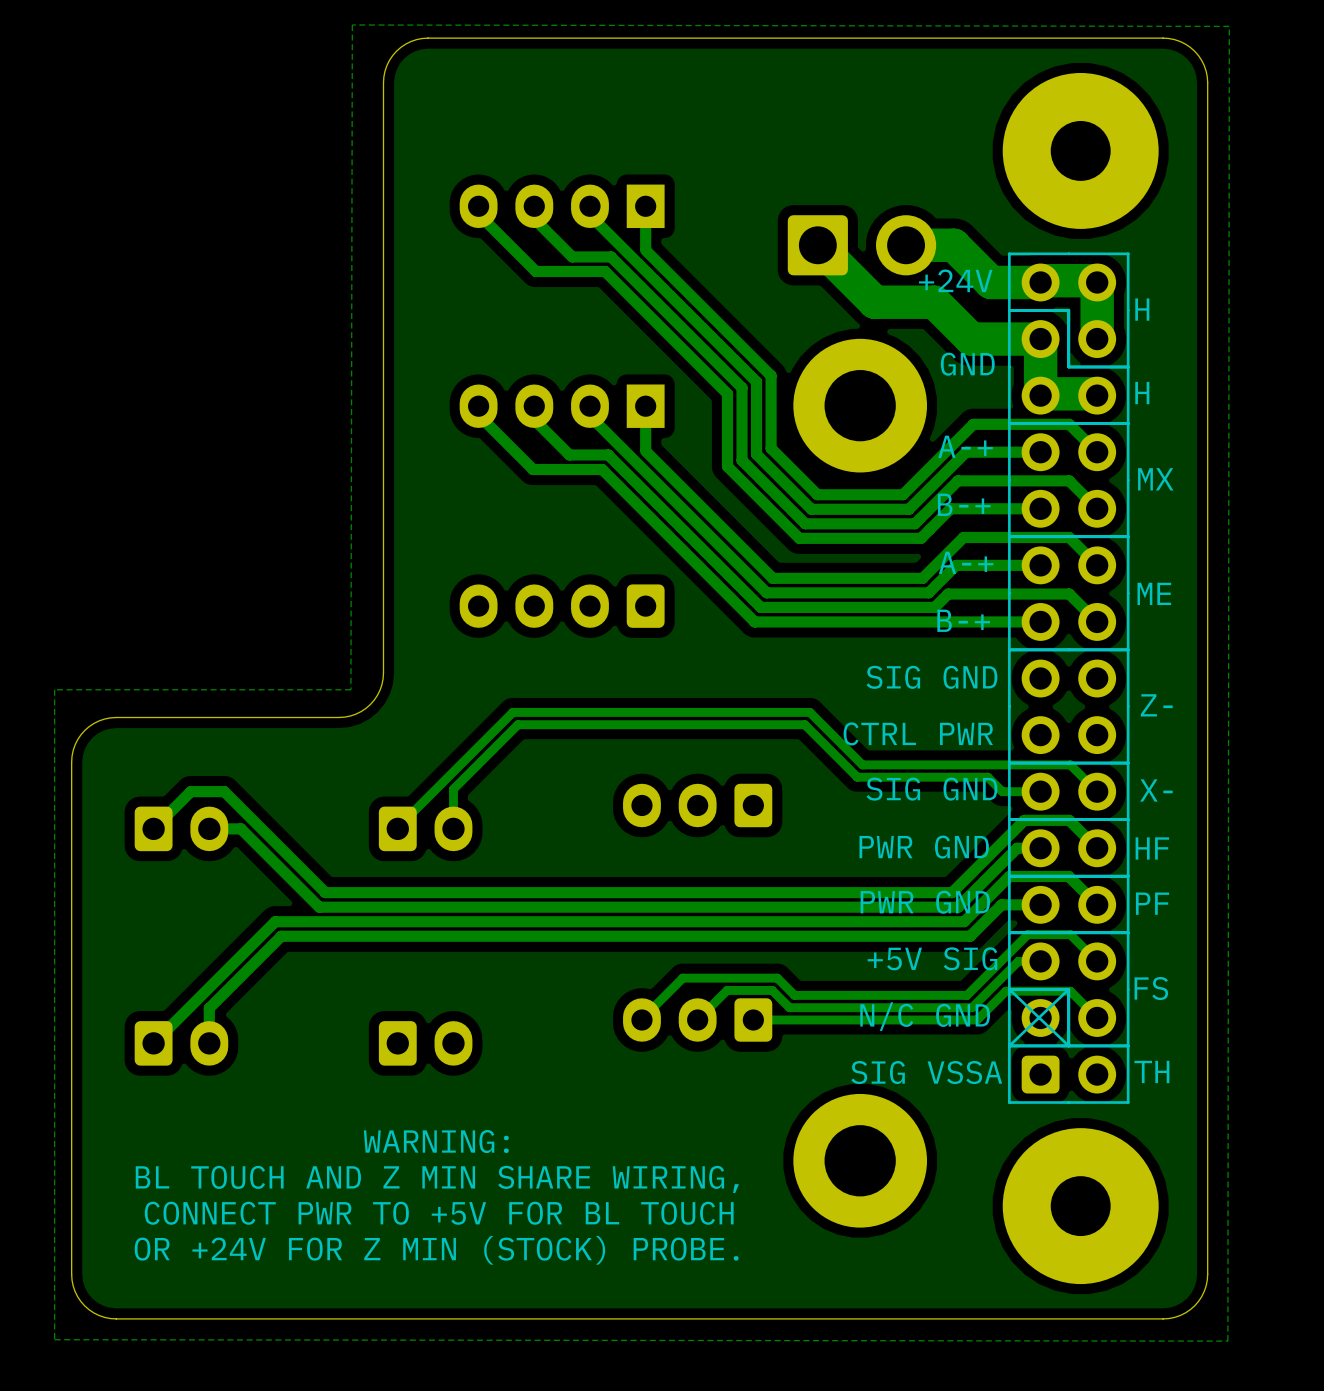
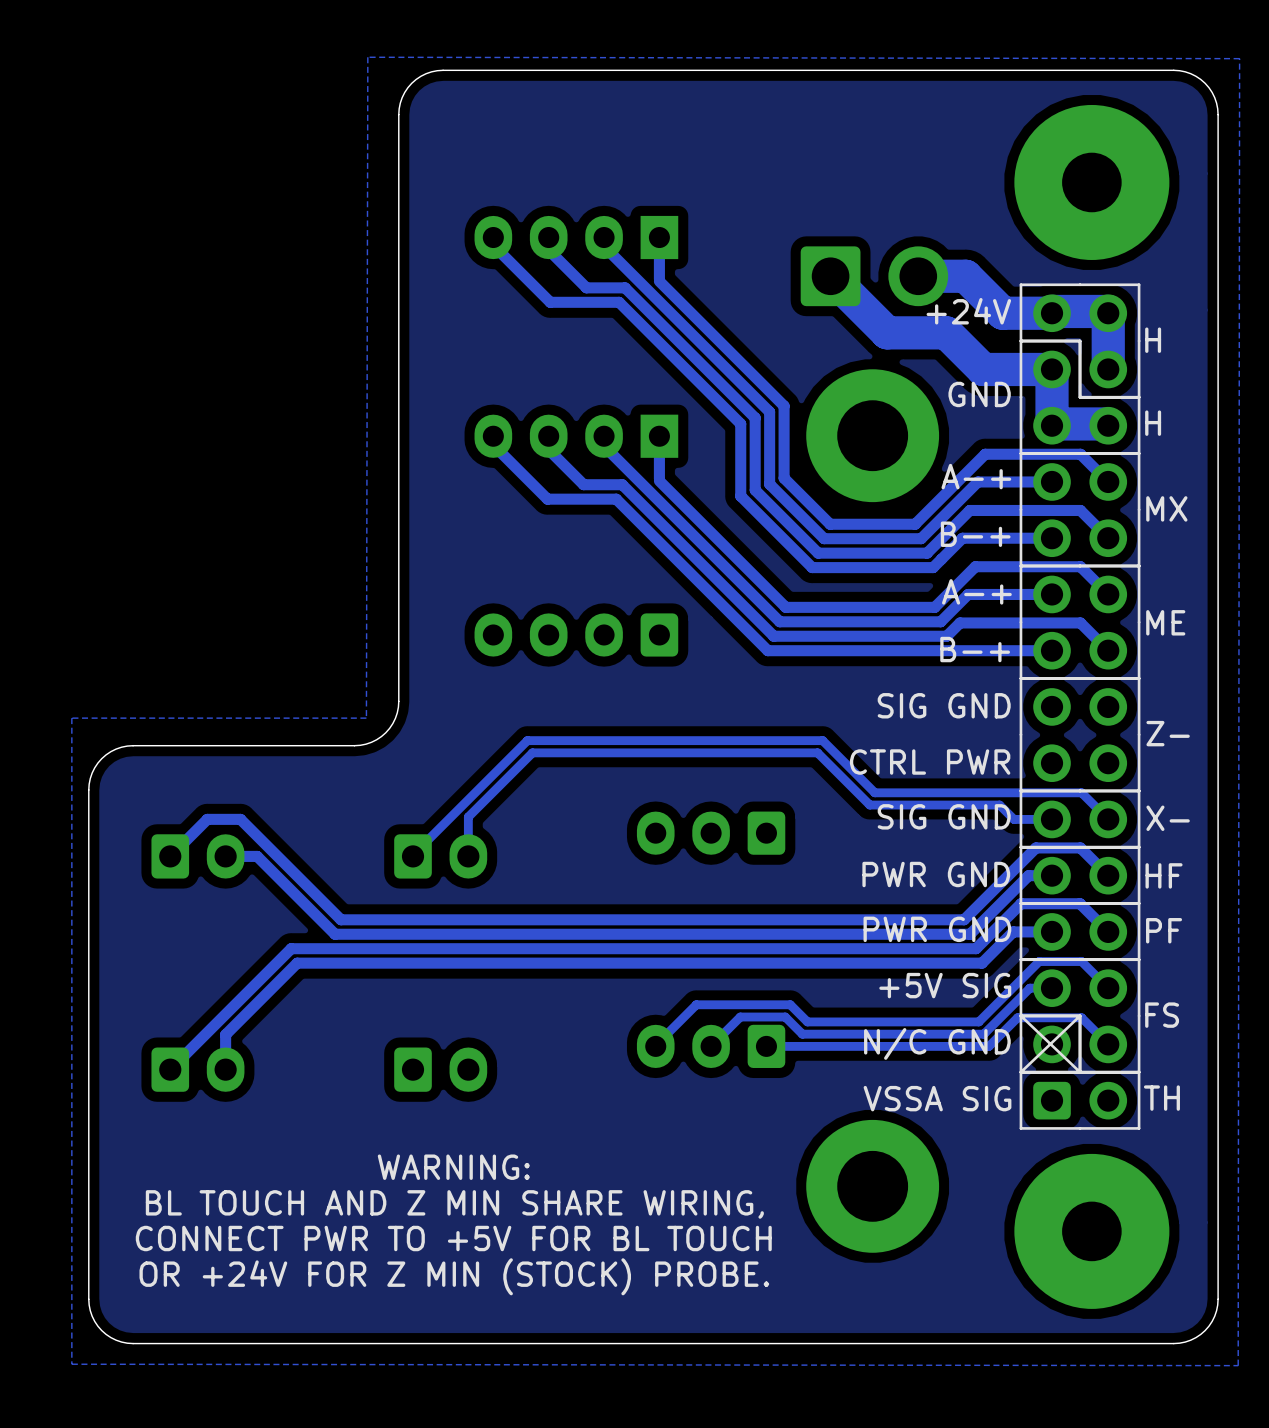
text: SIG VSSA (926, 1072) -> VSSA SIG (937, 1098)

